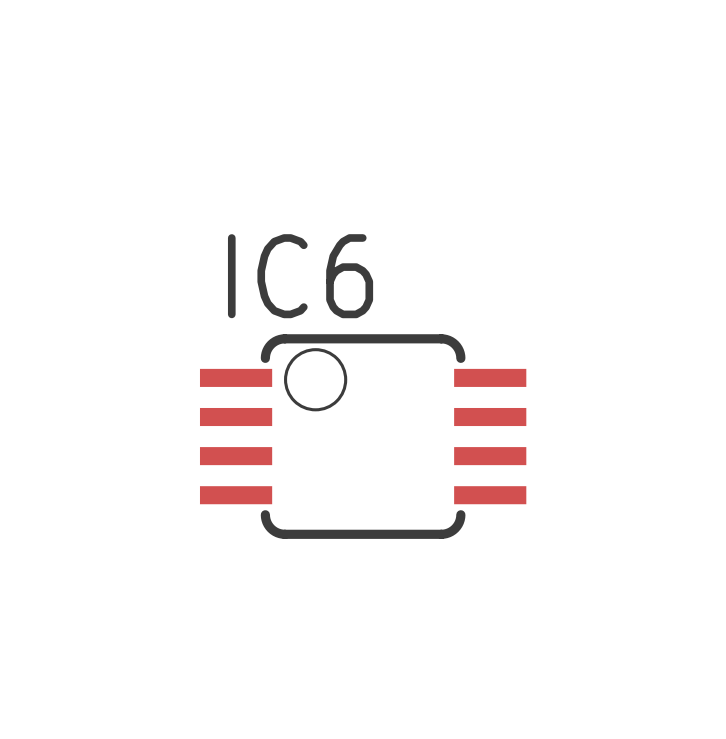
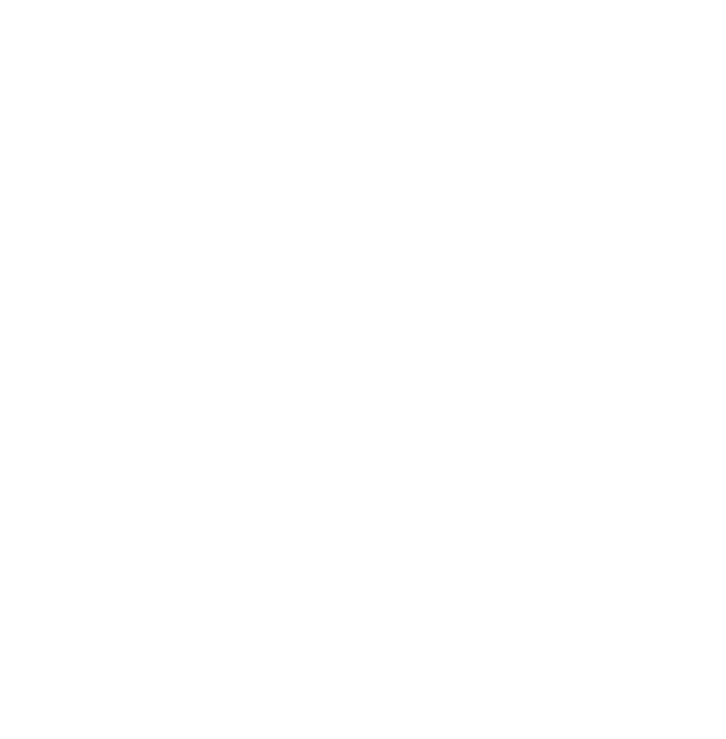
IC6: (363, 436) -> none

